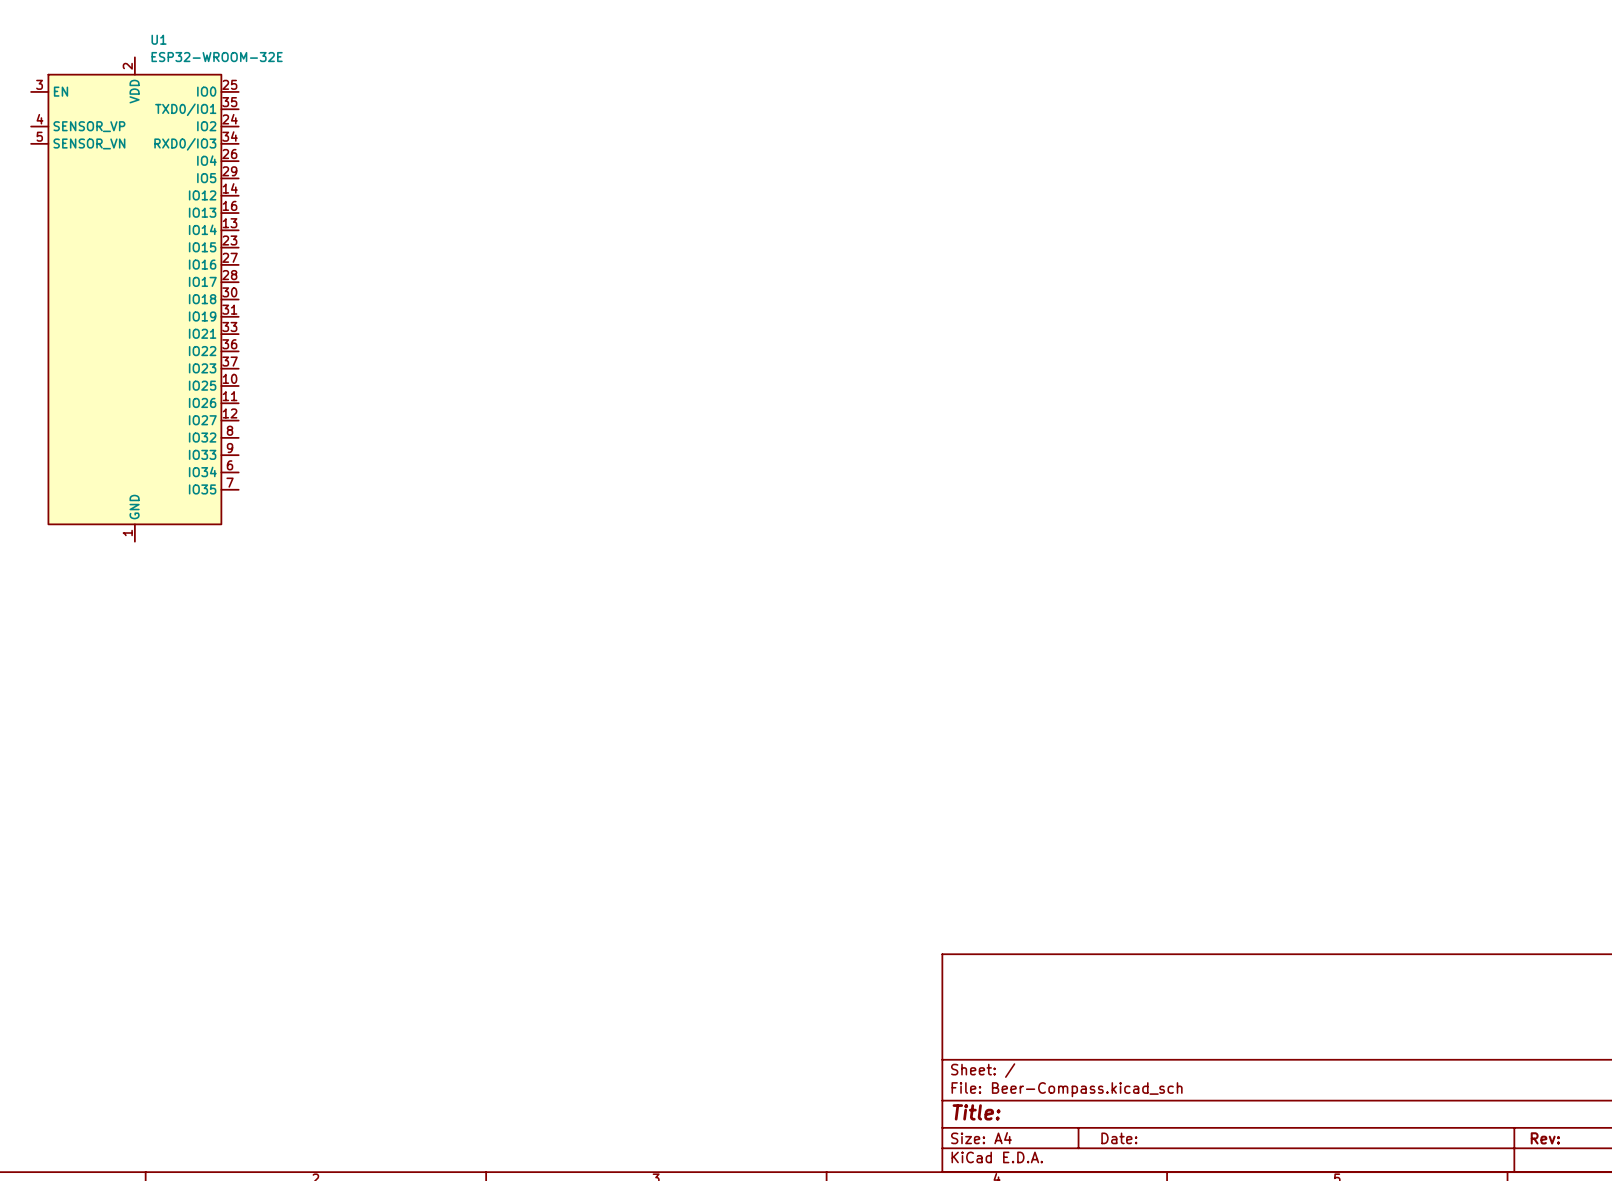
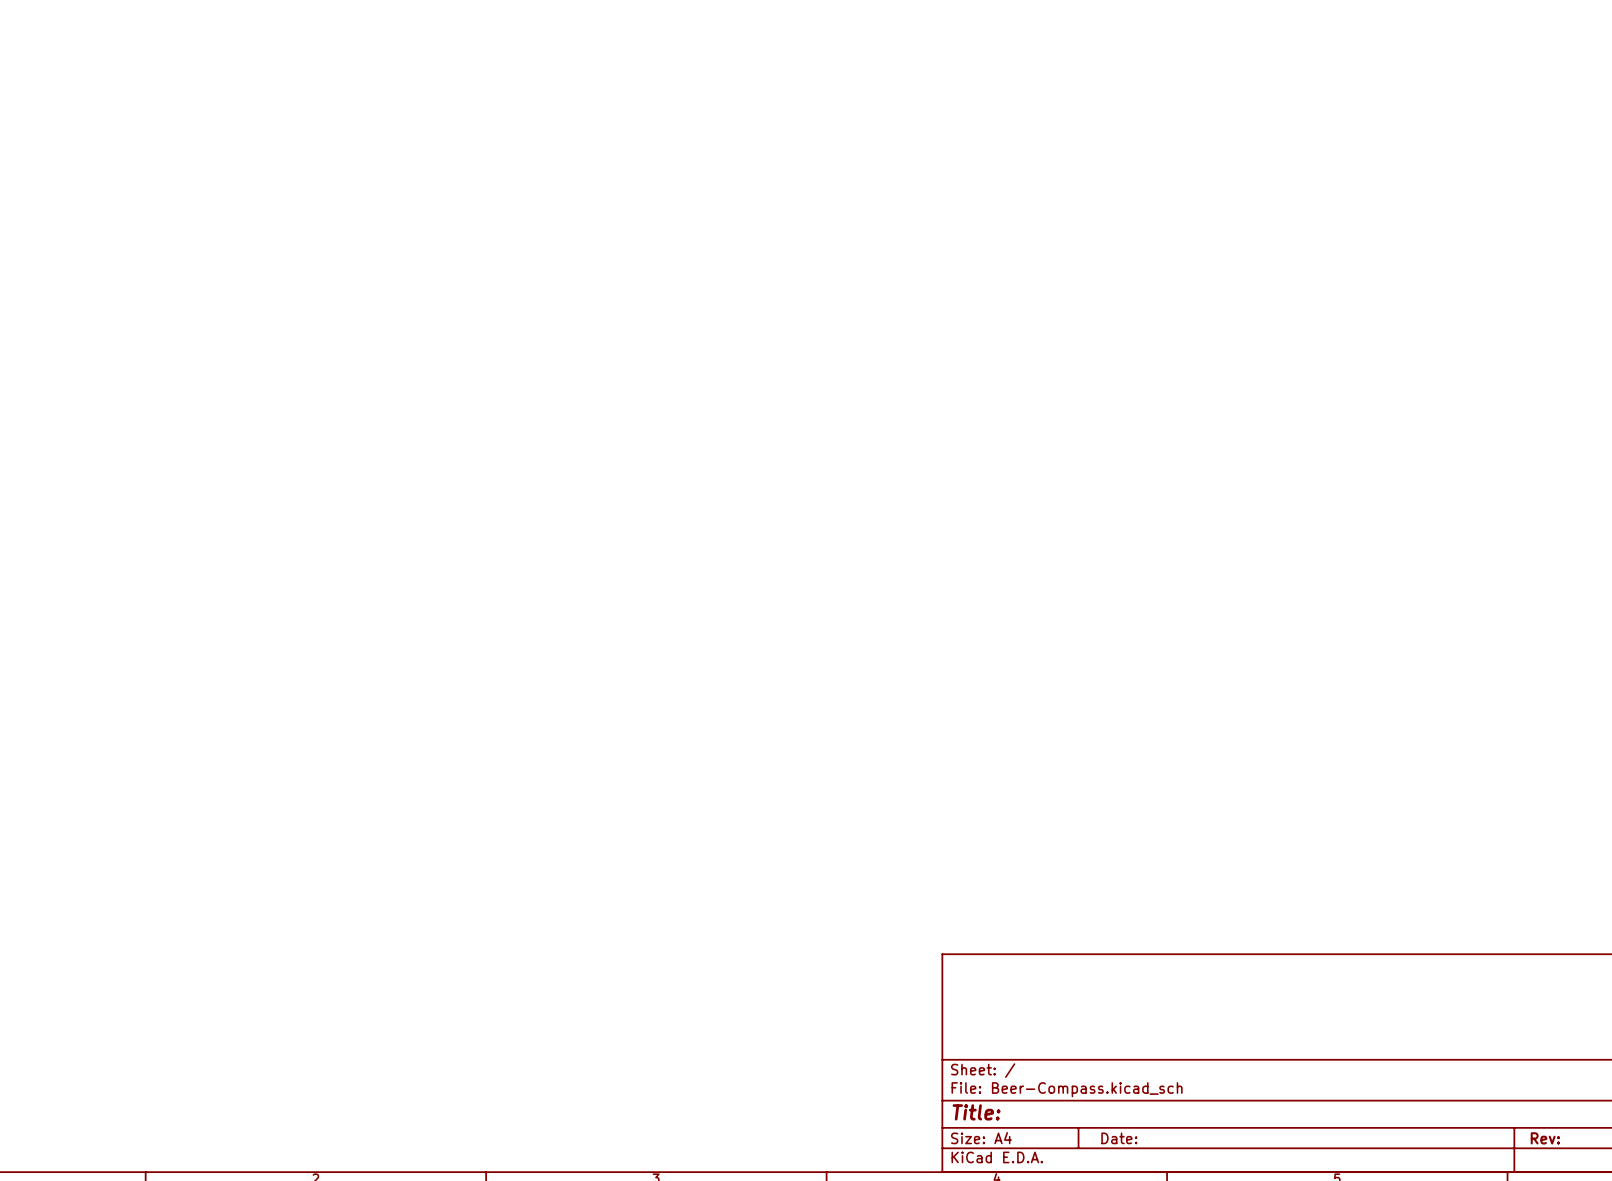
U1: ESP32-WROOM-32E (134, 299) -> none

